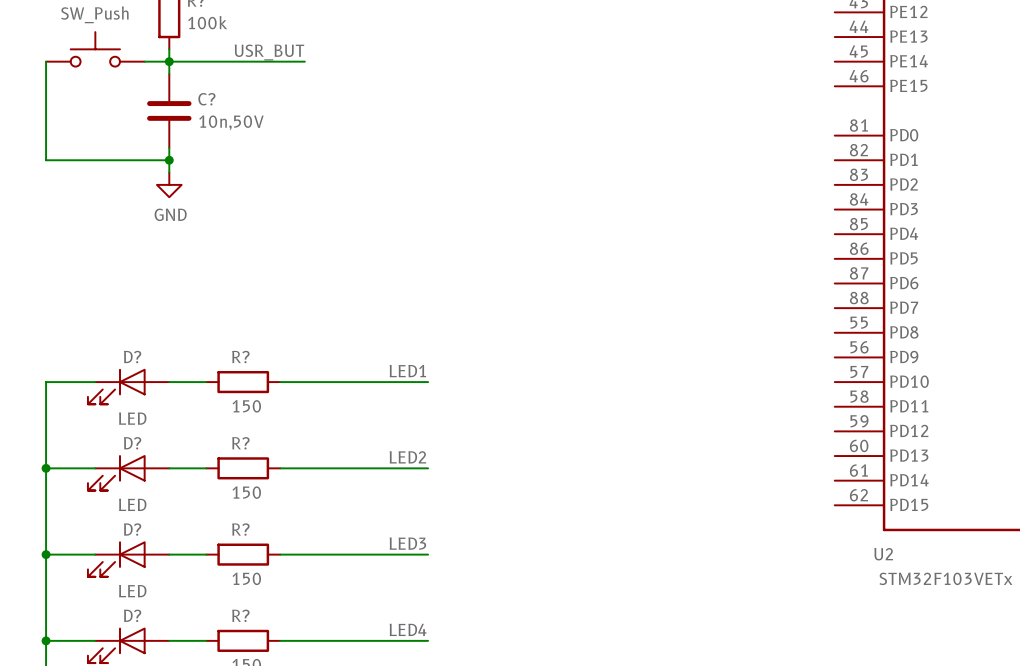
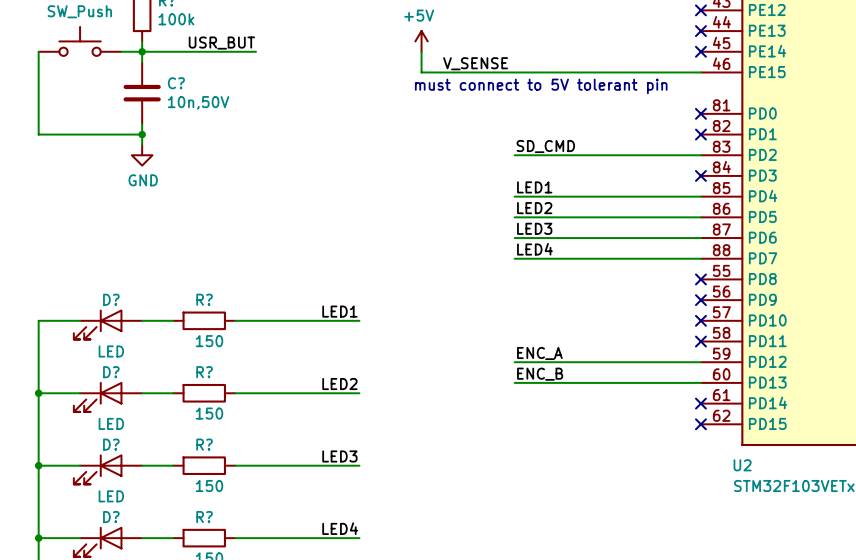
no-connect mark: none -> (700, 10)
no-connect mark: none -> (700, 31)
power symbol: none -> +5V (421, 41)
wire: none -> (421, 51) (421, 72) (700, 72)
no-connect mark: none -> (700, 51)
label: none -> V_SENSE (475, 63)
text: none -> must connect to 5V tolerant pin (541, 86)
no-connect mark: none -> (700, 113)
no-connect mark: none -> (700, 134)
label: none -> SD_CMD (545, 146)
wire: none -> (514, 155) (700, 155)
no-connect mark: none -> (700, 175)
label: none -> LED1 (534, 187)
wire: none -> (514, 196) (700, 196)
label: none -> LED2 (534, 208)
wire: none -> (514, 217) (700, 217)
label: none -> LED3 (534, 228)
wire: none -> (514, 238) (700, 238)
label: none -> LED4 (534, 249)
wire: none -> (514, 258) (700, 258)
no-connect mark: none -> (700, 279)
no-connect mark: none -> (700, 300)
no-connect mark: none -> (700, 320)
no-connect mark: none -> (700, 341)
label: none -> ENC_A (539, 353)
wire: none -> (514, 362) (700, 362)
label: none -> ENC_B (540, 374)
wire: none -> (514, 382) (700, 382)
no-connect mark: none -> (700, 403)
no-connect mark: none -> (700, 424)

